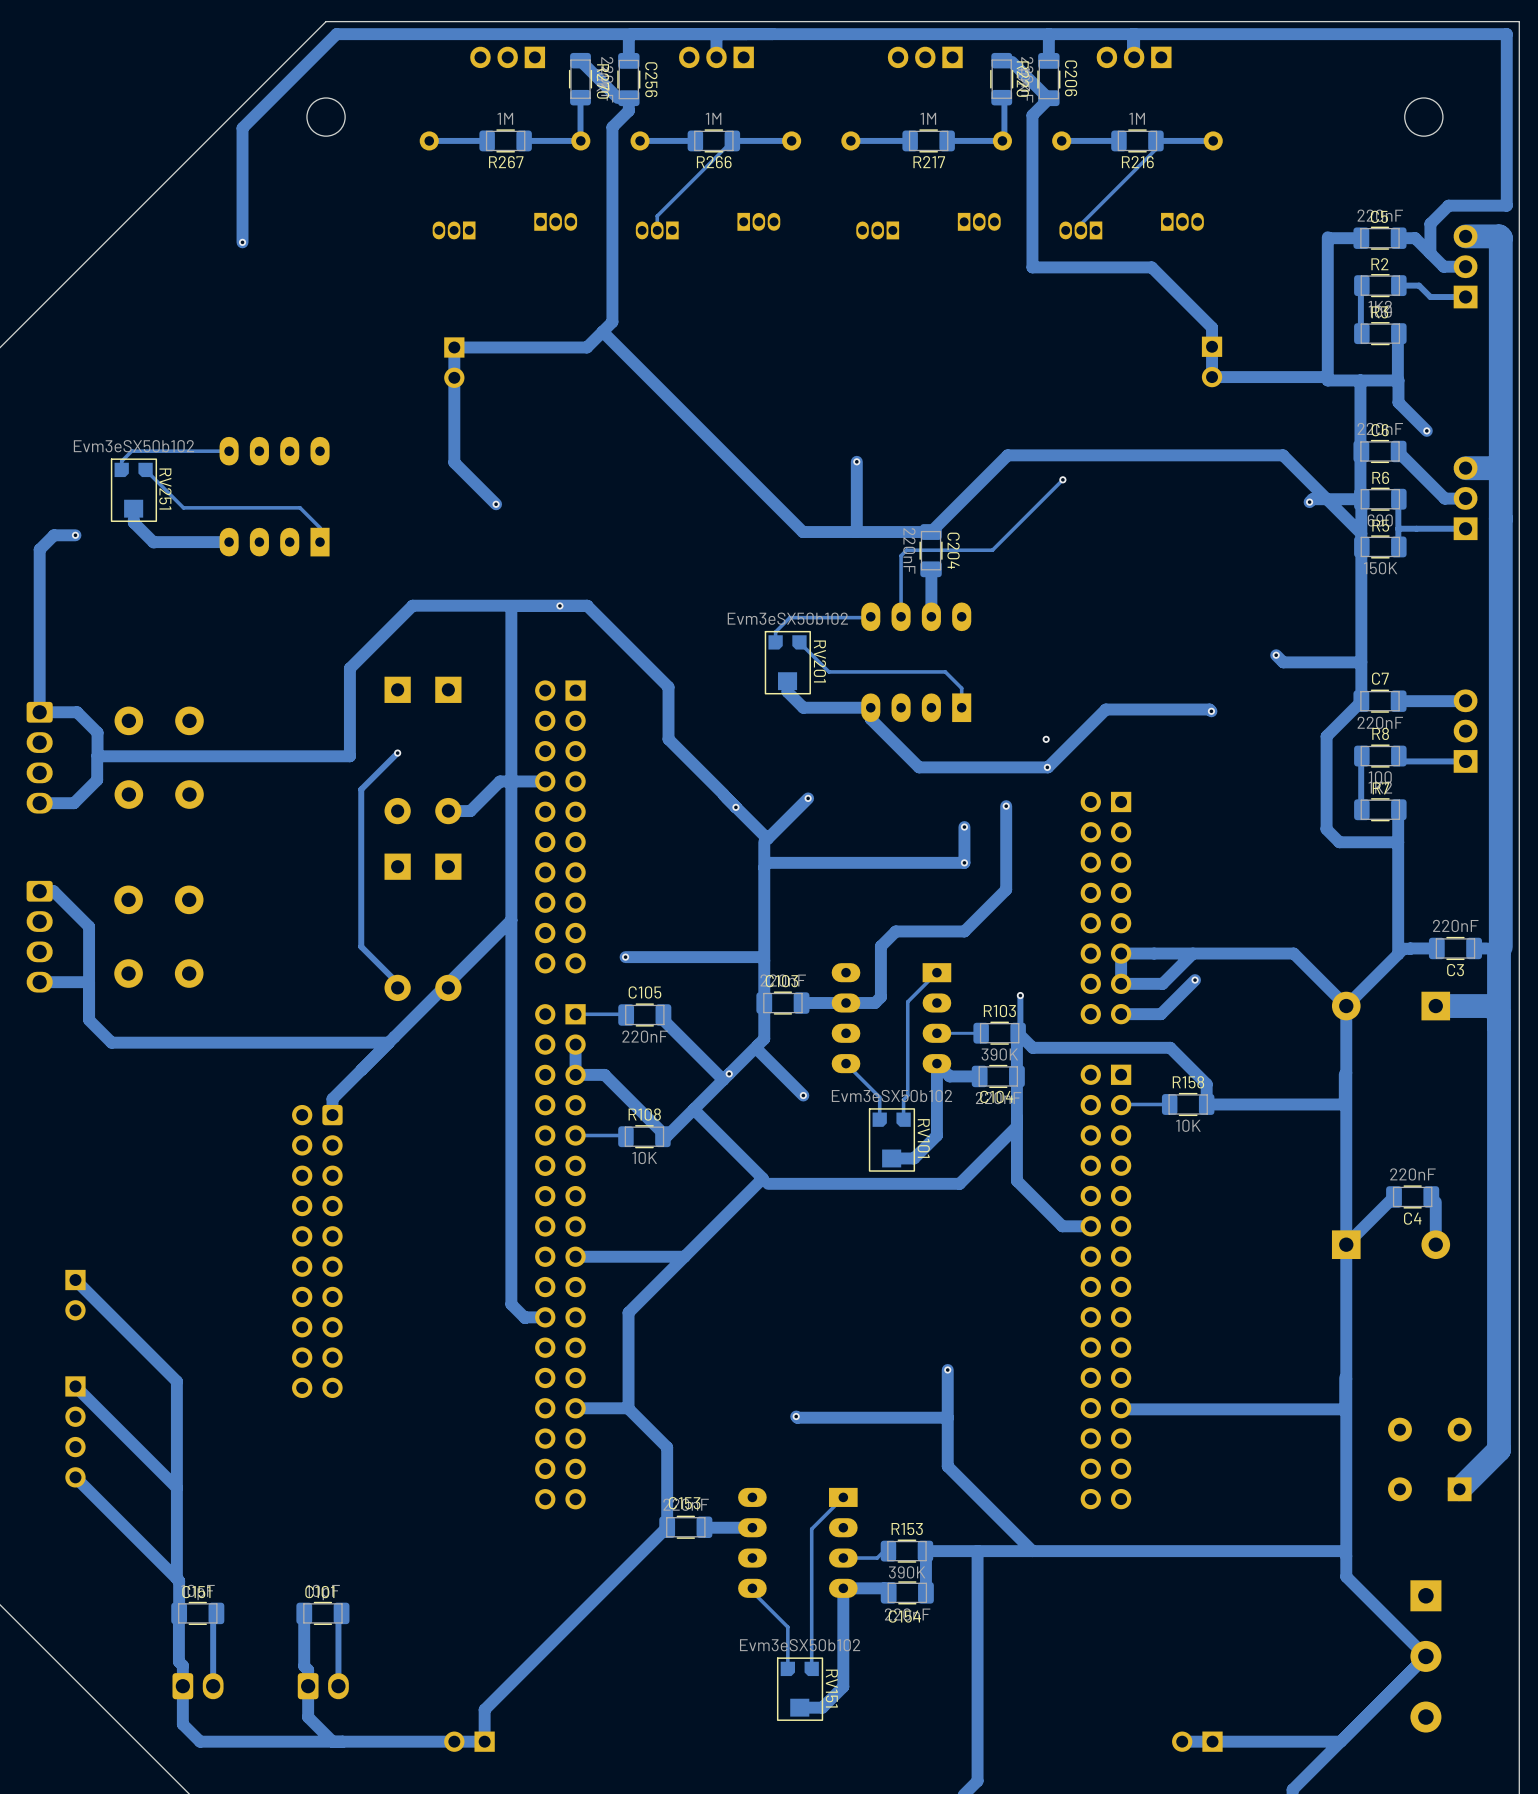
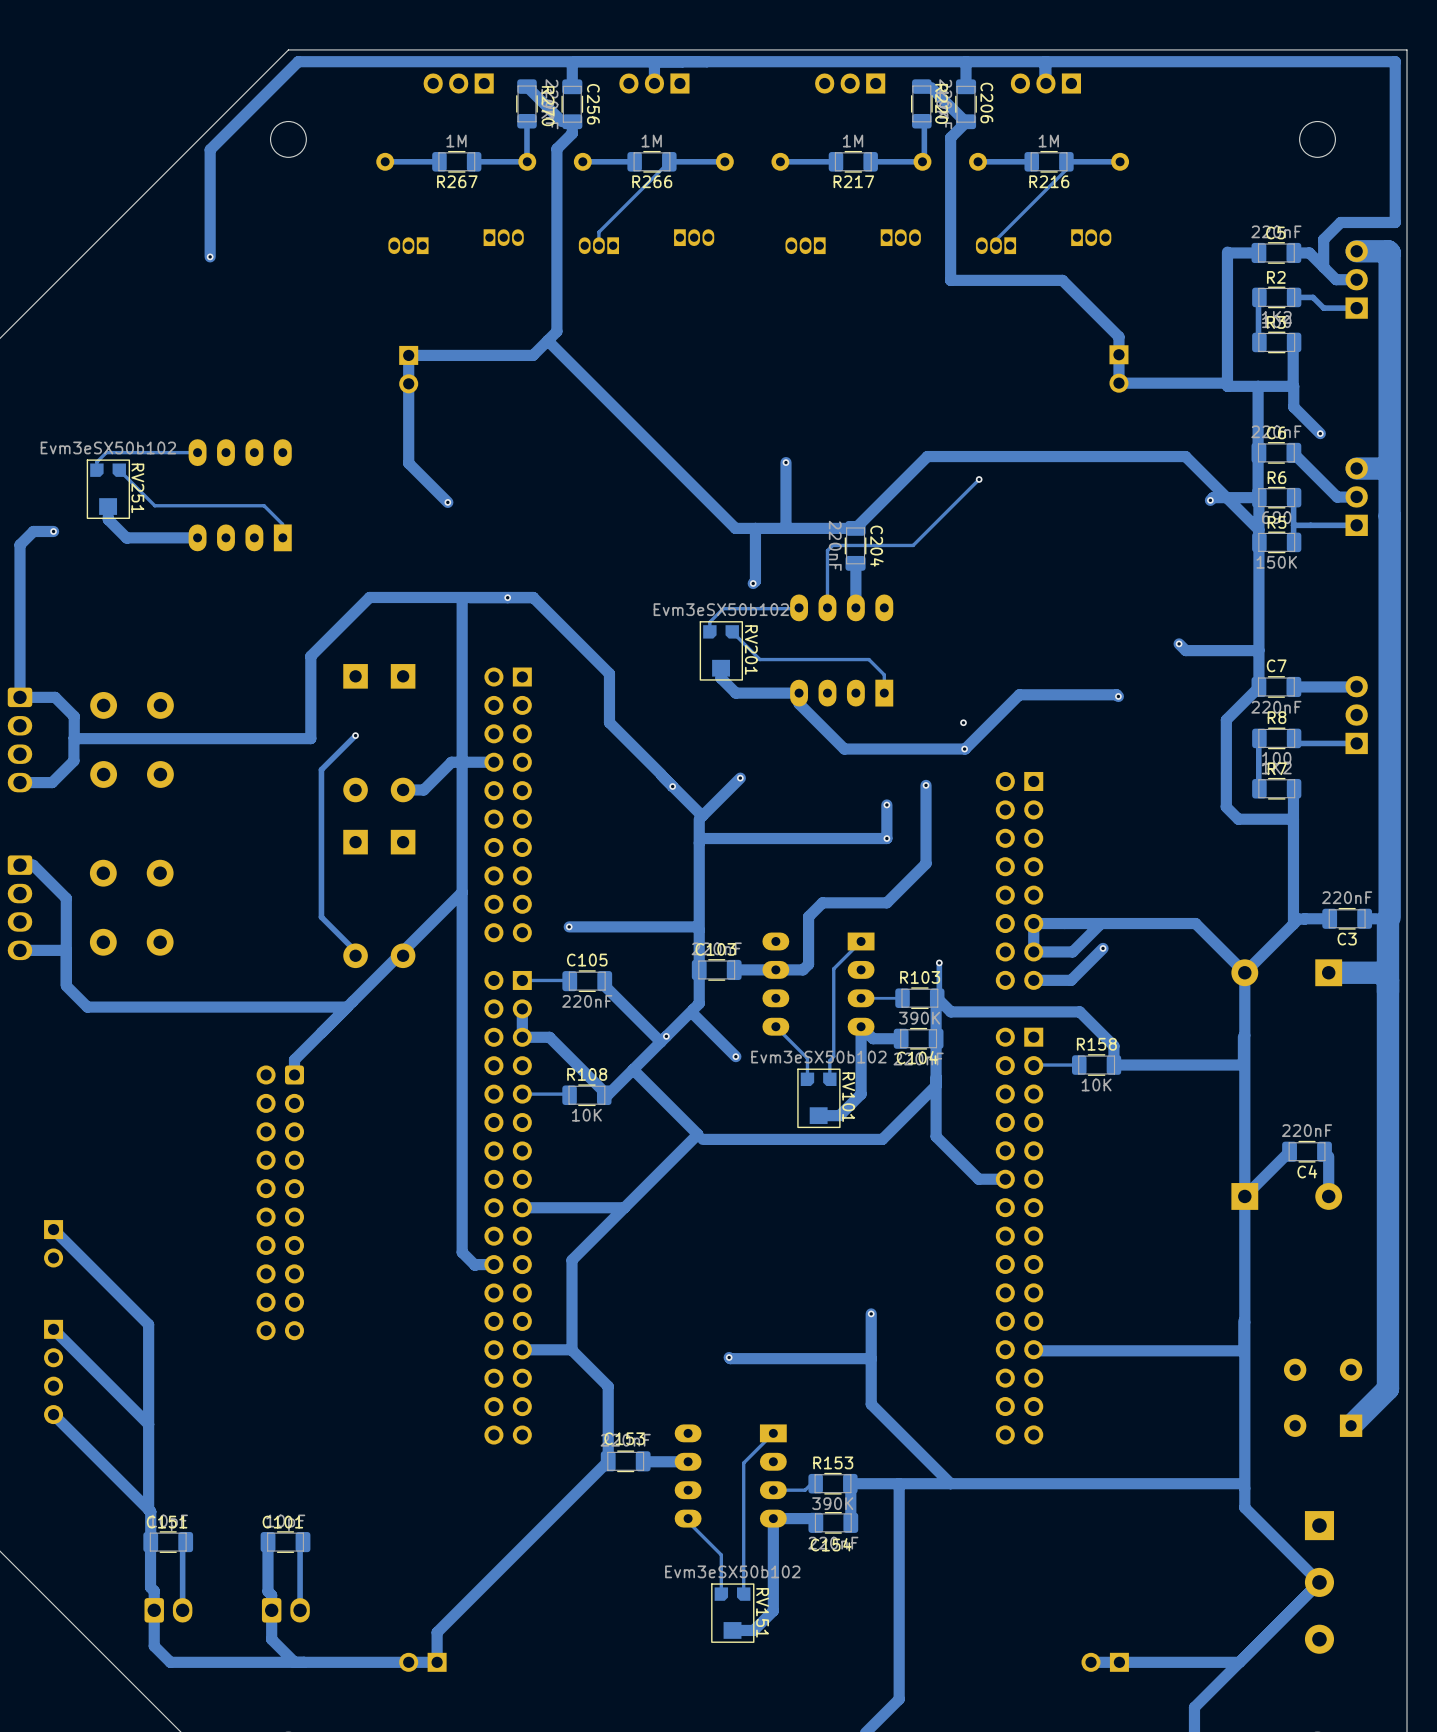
track: none -> (755, 528) (755, 581) (753, 583)
via: none -> (753, 583)

